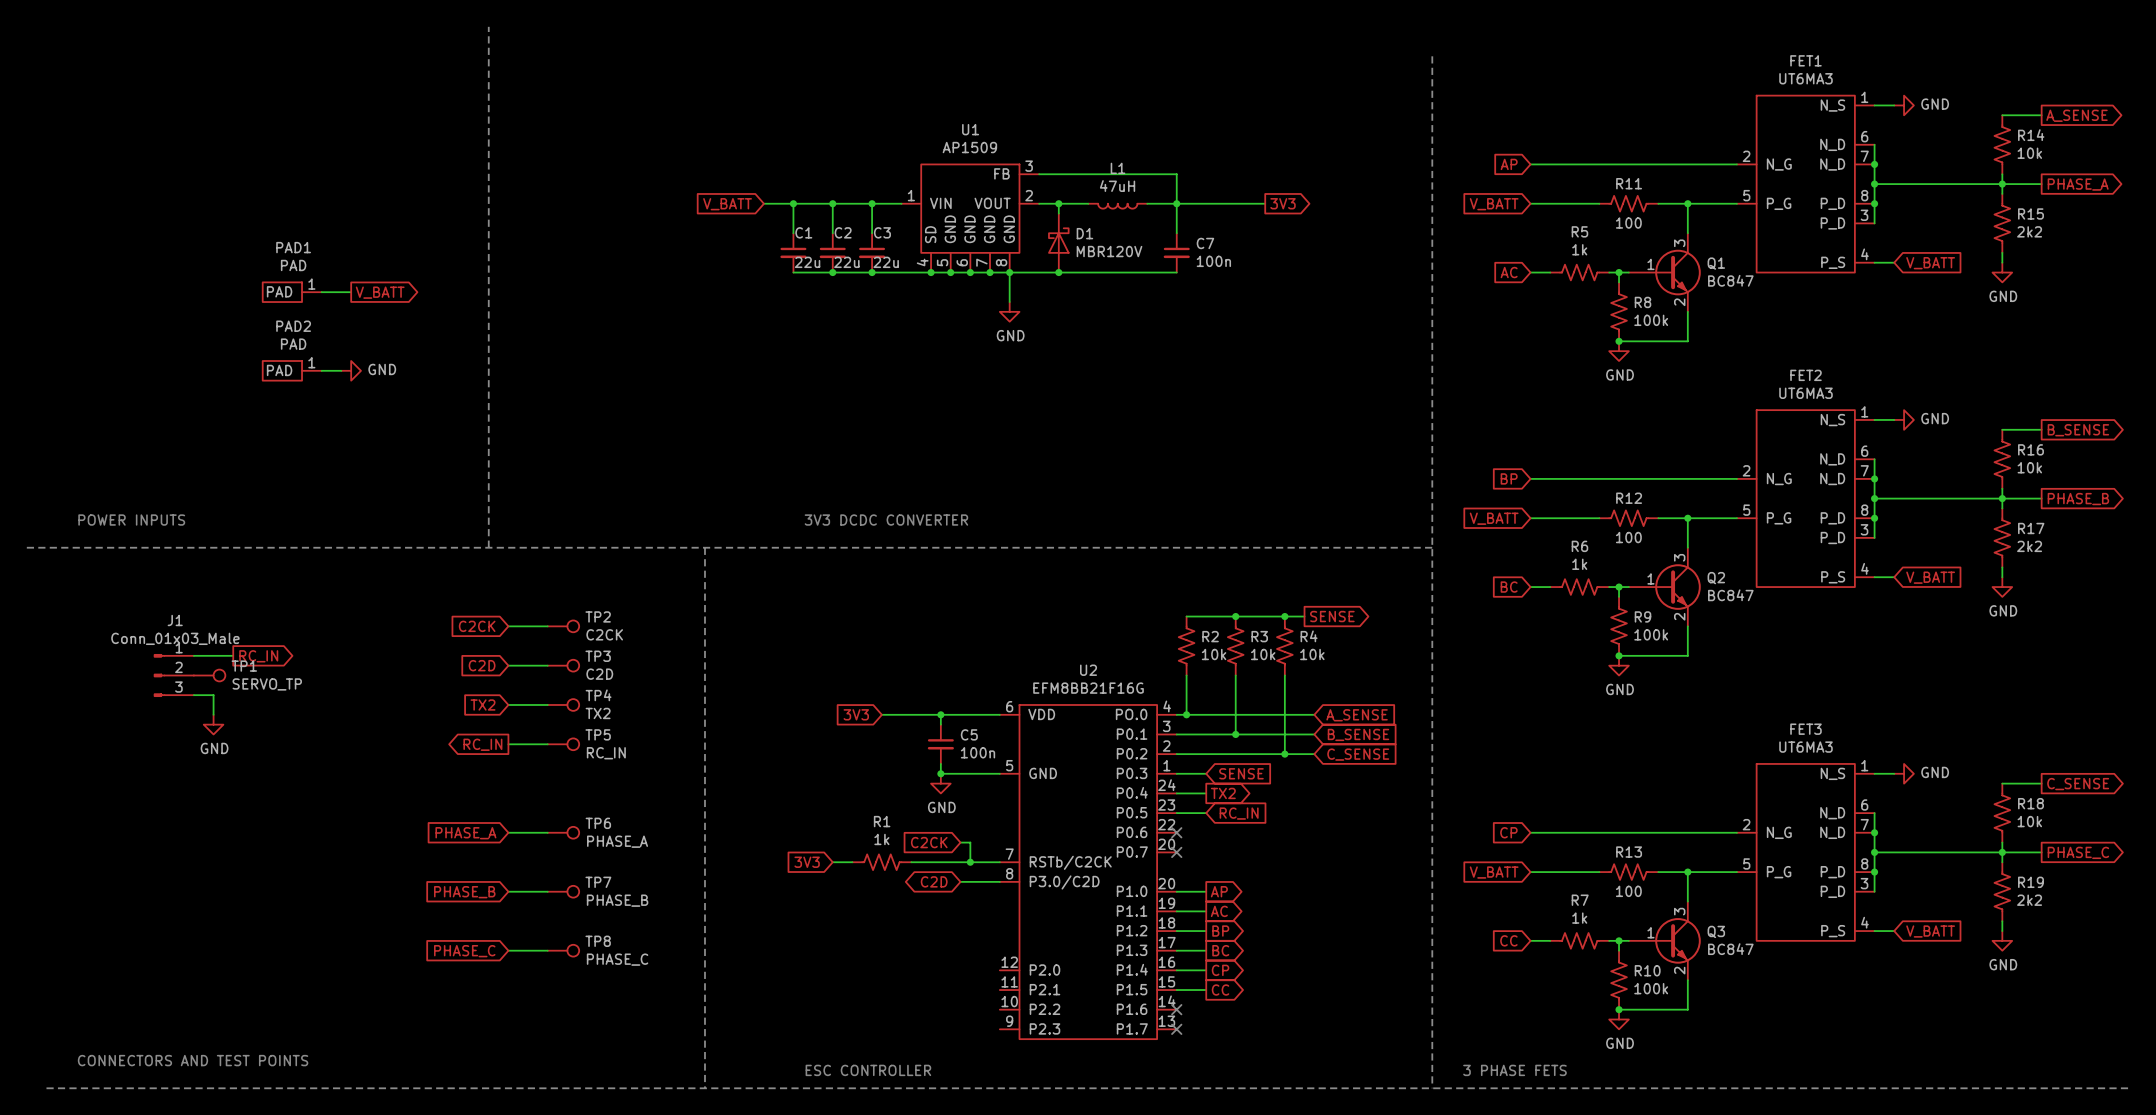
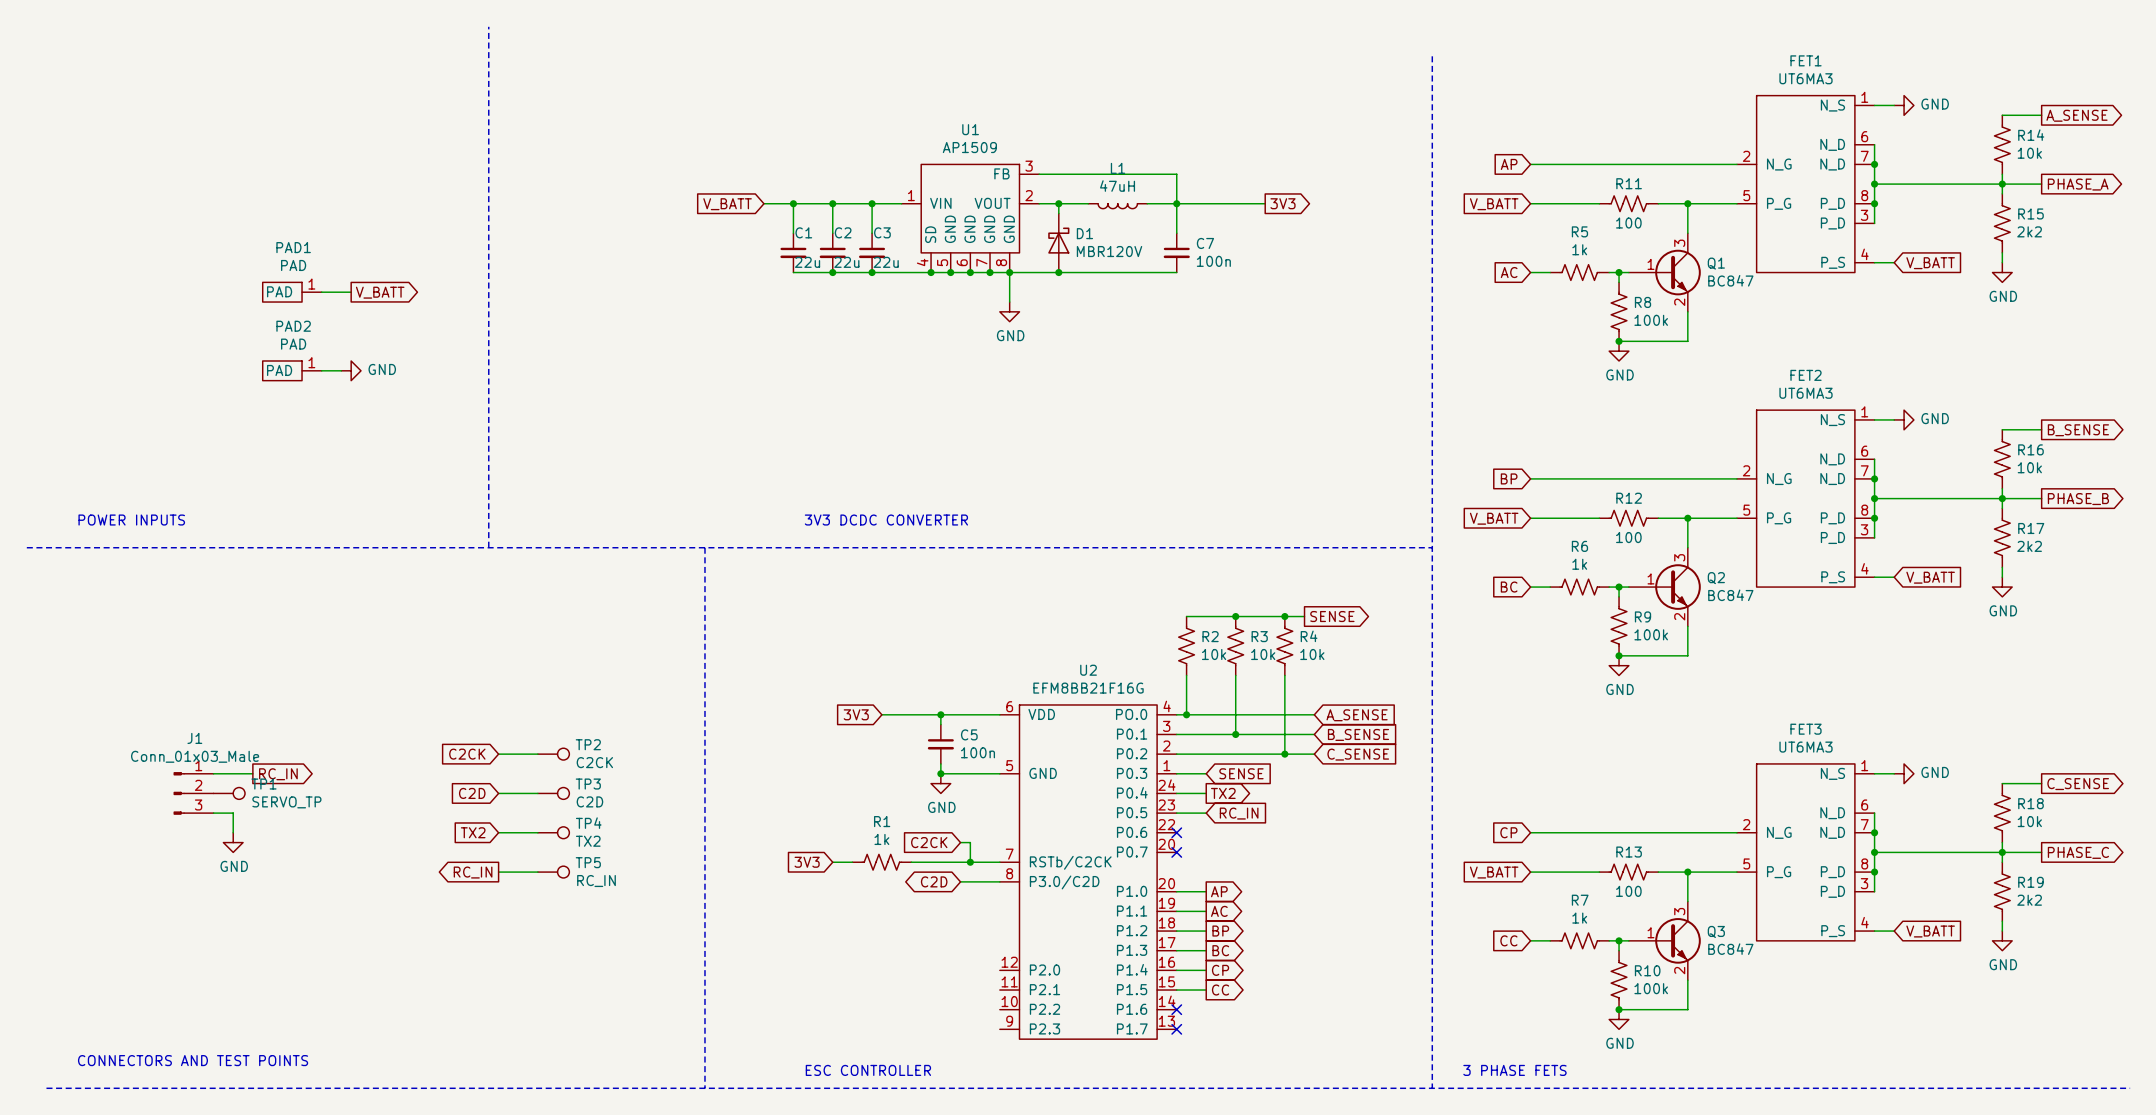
global label position: C2CK (477, 626) -> C2CK (467, 754)
wire: (508, 626) (547, 626) -> (498, 754) (537, 754)
TP2 position: (563, 626) -> (553, 754)
wire: (193, 655) (233, 655) -> (213, 773) (252, 773)
global label position: RC_IN (258, 656) -> RC_IN (278, 774)
global label position: C2D (482, 665) -> C2D (472, 793)
wire: (508, 665) (547, 665) -> (498, 793) (537, 793)
TP3 position: (563, 665) -> (553, 793)
J1 position: (173, 675) -> (193, 793)
TP1 position: (209, 675) -> (229, 793)
wire: (193, 695) (213, 695) (213, 714) -> (213, 813) (233, 813) (233, 832)
global label position: TX2 (483, 704) -> TX2 (473, 832)
wire: (508, 704) (547, 704) -> none
TP4 position: (563, 704) -> (553, 832)
power symbol position: GND (213, 724) -> GND (233, 842)
global label position: RC_IN (482, 744) -> RC_IN (473, 872)
wire: (508, 744) (547, 744) -> (498, 872) (537, 872)
TP5 position: (563, 744) -> (553, 872)
TP6: PHASE_A (563, 832) -> none
global label: PHASE_A (465, 833) -> none
wire: (508, 891) (547, 891) -> none
TP7: PHASE_B (563, 891) -> none
global label: PHASE_B (464, 892) -> none
wire: (508, 950) (547, 950) -> none
TP8: PHASE_C (563, 950) -> none
global label: PHASE_C (464, 951) -> none

